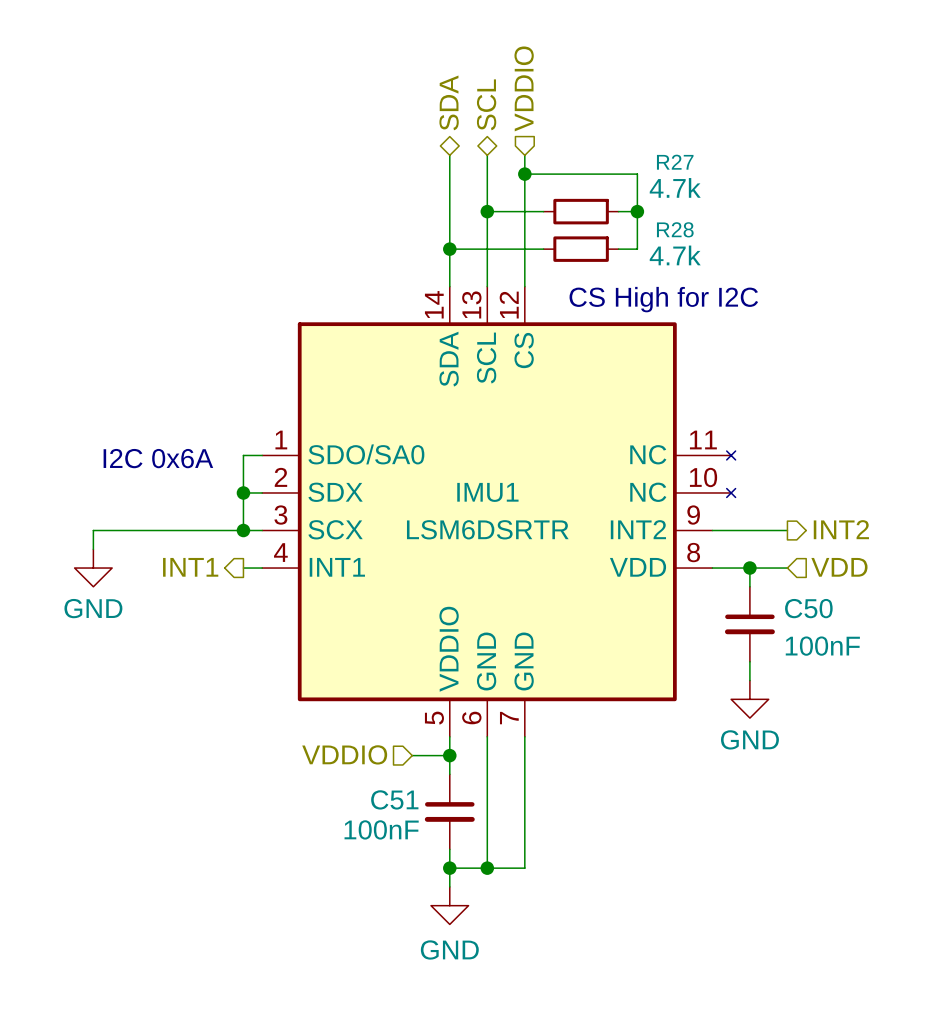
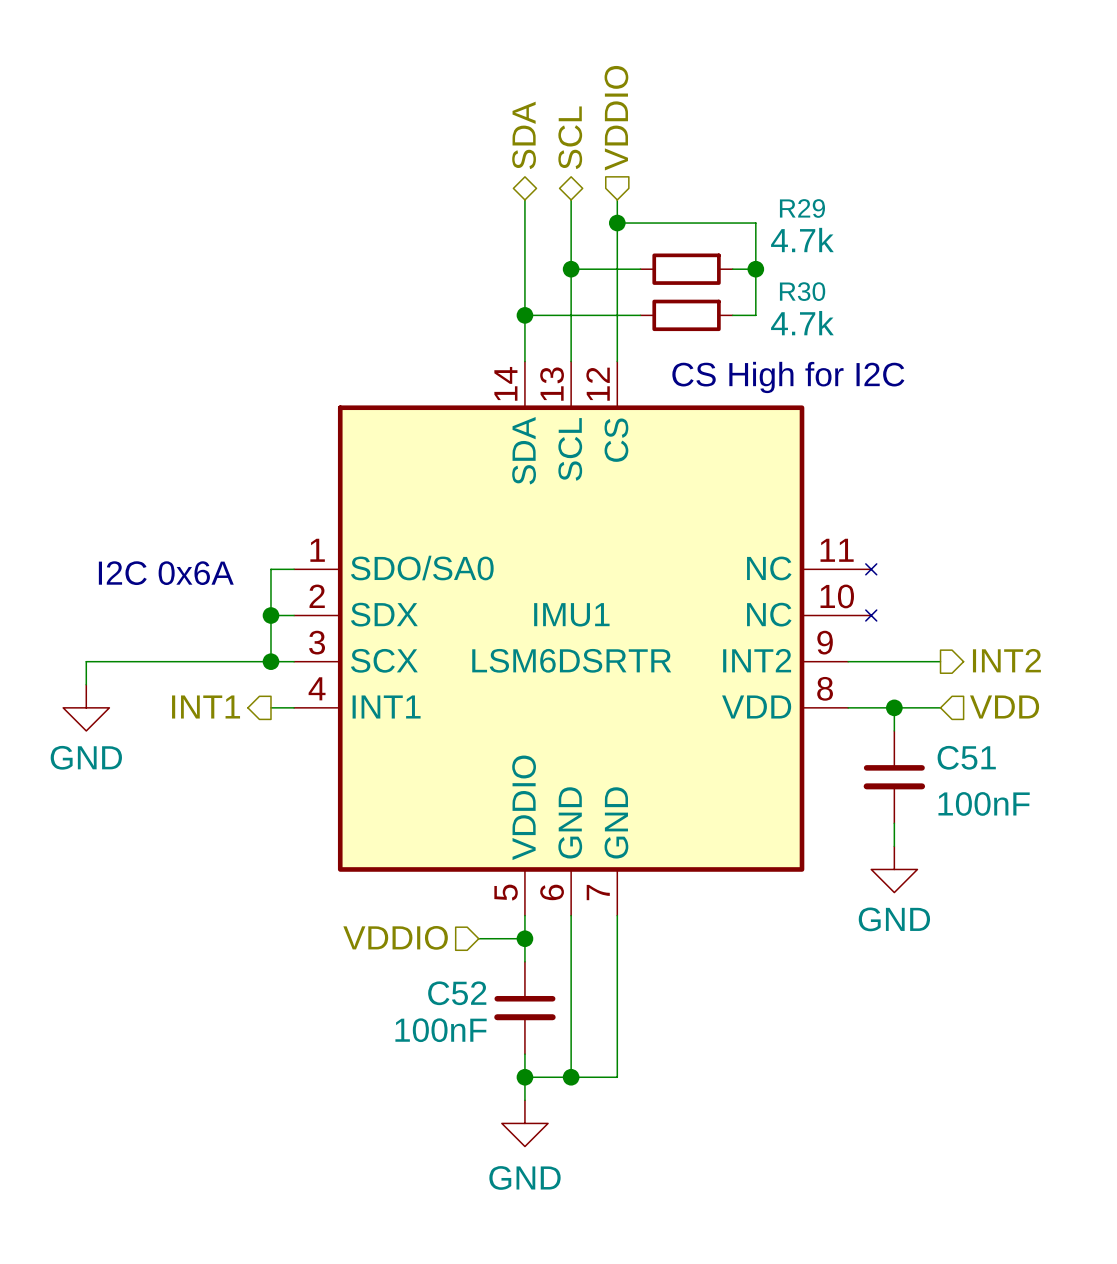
R27 name: R27 (675, 162) -> R29 (802, 208)
R28 name: R28 (675, 229) -> R30 (802, 291)
C50 name: C50 (808, 608) -> C51 (966, 757)
C51 name: C51 (394, 799) -> C52 (457, 993)

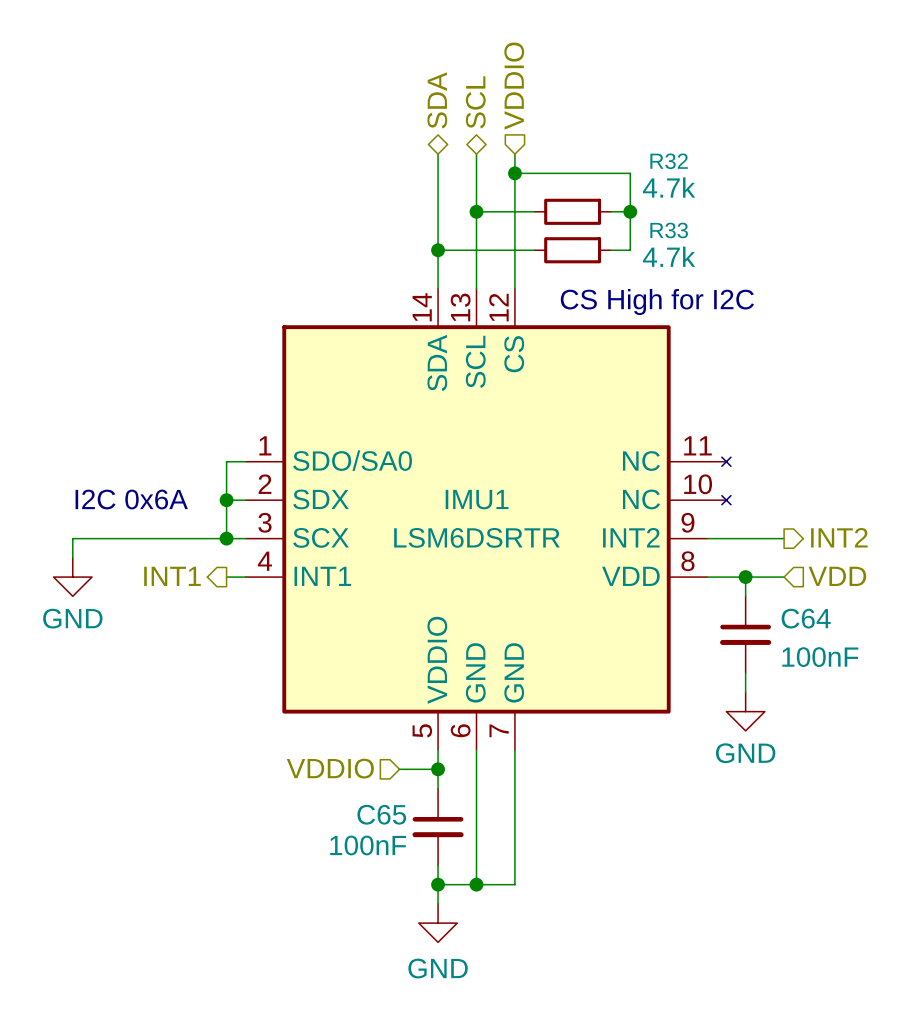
R29 name: R29 (802, 208) -> R32 (669, 161)
R30 name: R30 (802, 291) -> R33 (669, 230)
text position: I2C 0x6A (166, 573) -> I2C 0x6A (131, 499)
C51 name: C51 (966, 757) -> C64 (806, 618)
C52 name: C52 (457, 993) -> C65 (381, 814)

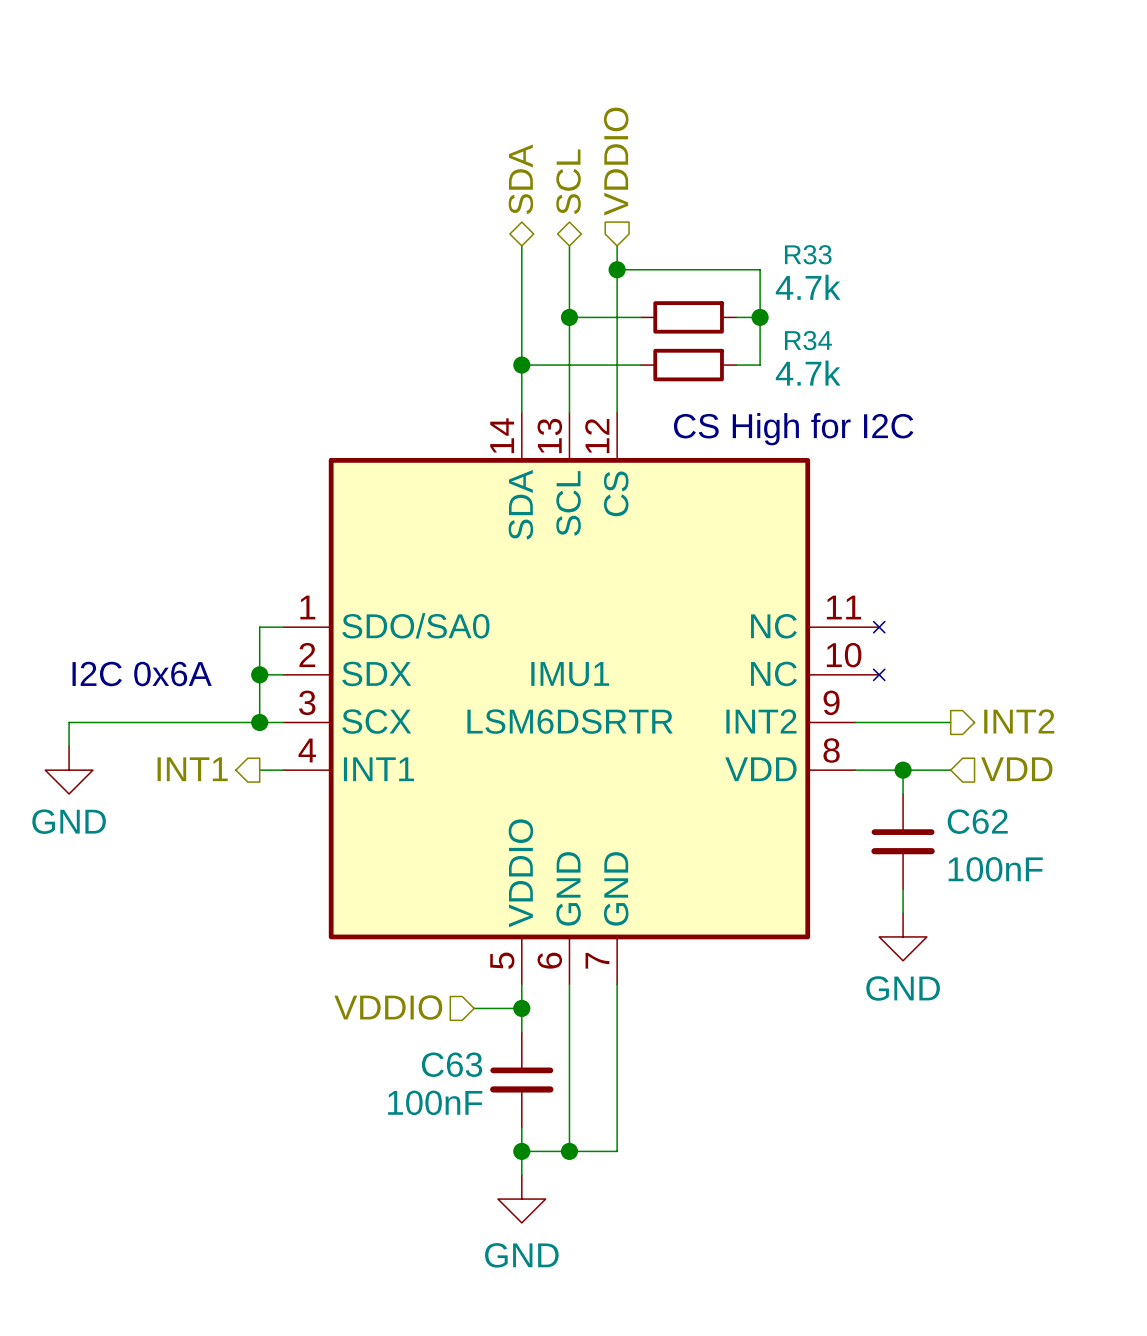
R32 name: R32 (669, 161) -> R33 (808, 254)
R33 name: R33 (669, 230) -> R34 (808, 340)
C64 name: C64 (806, 618) -> C62 (977, 821)
C65 name: C65 (381, 814) -> C63 (452, 1064)

